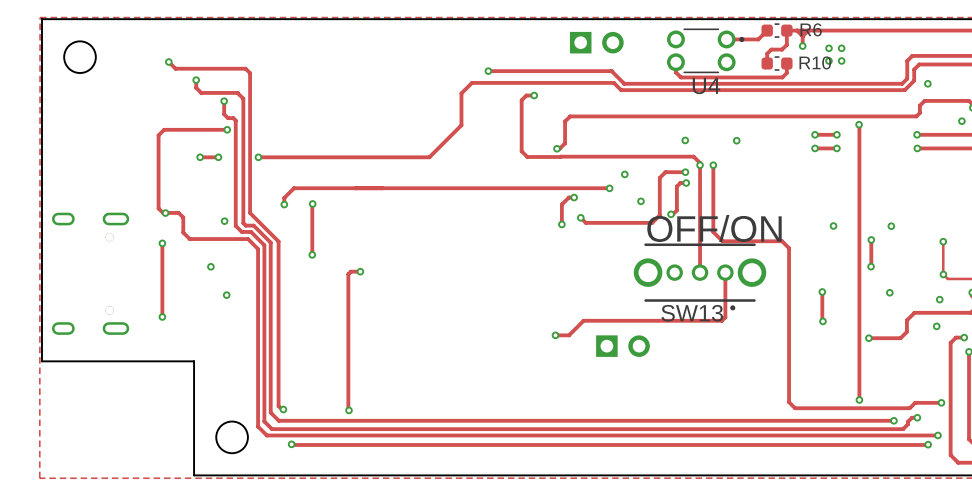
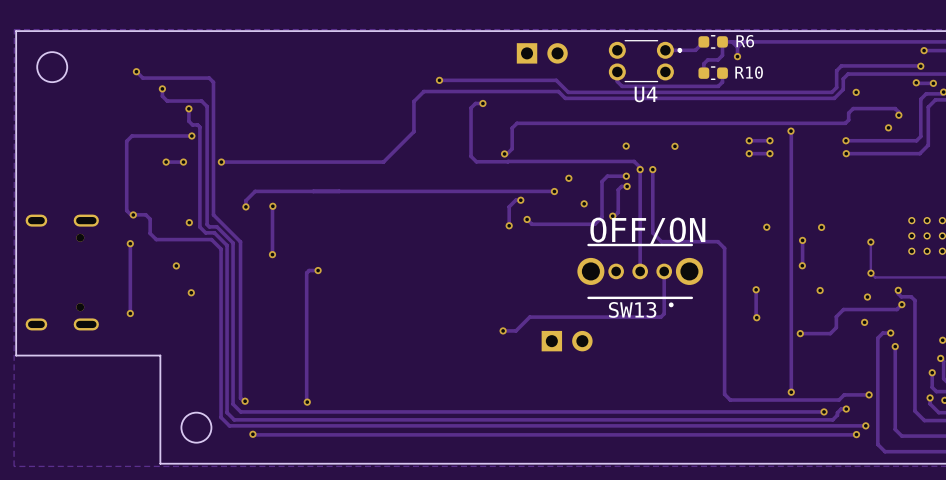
via: (828, 48) -> none
via: (841, 48) -> none
via: (828, 60) -> none
via: (841, 60) -> none

